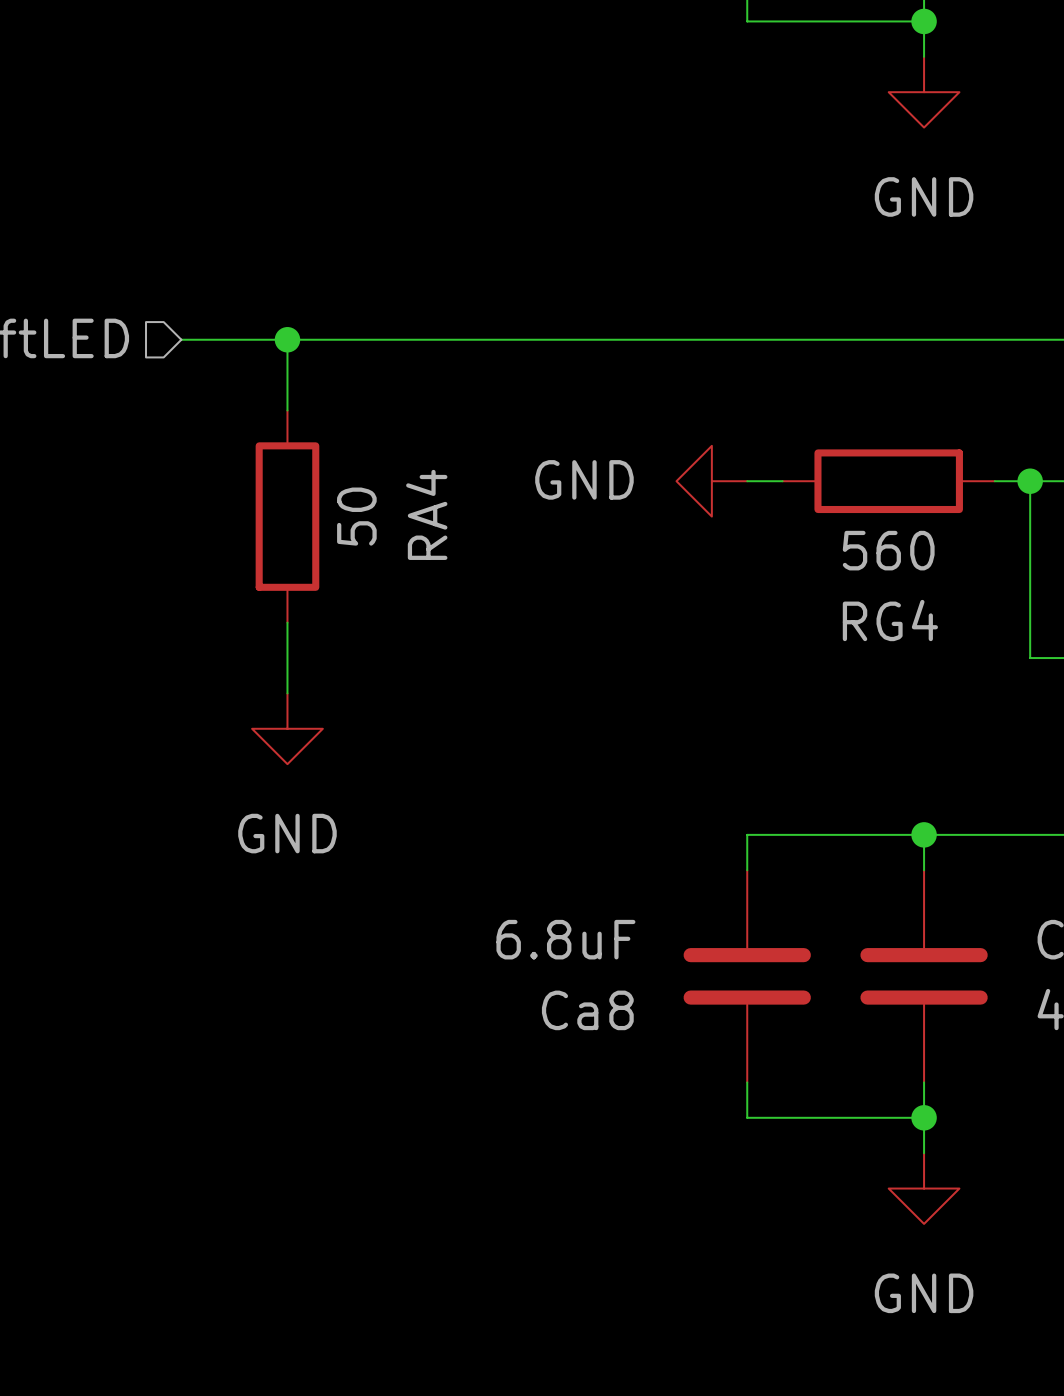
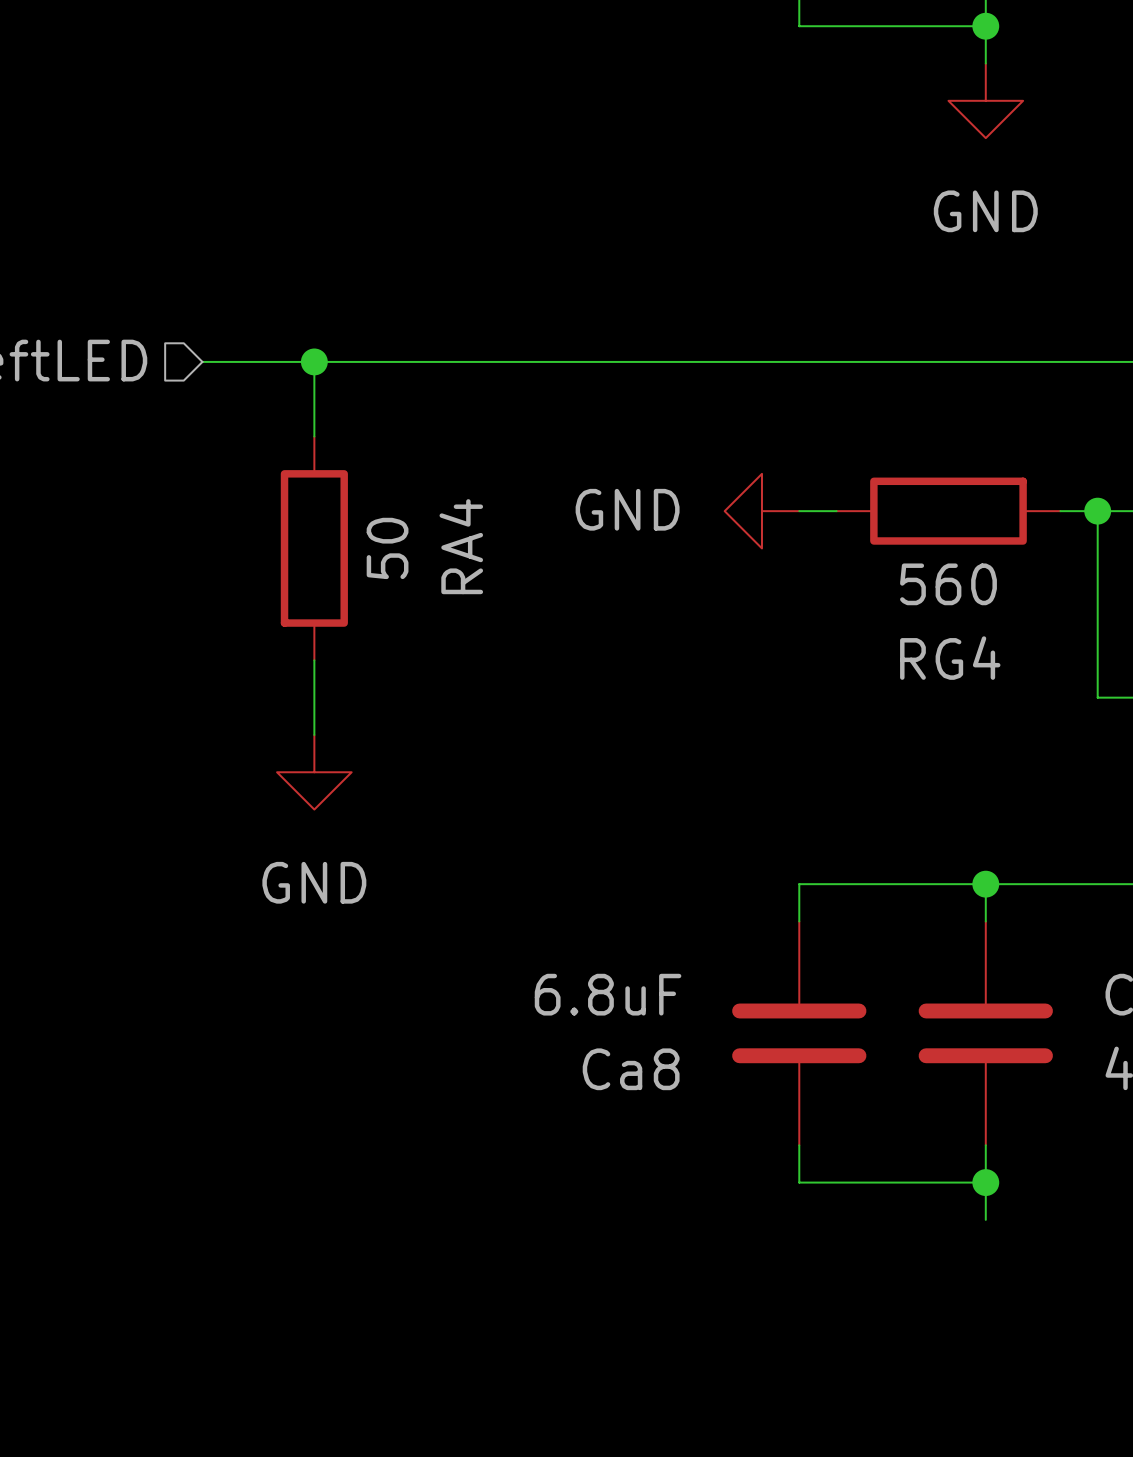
power symbol: GND (924, 1188) -> none

